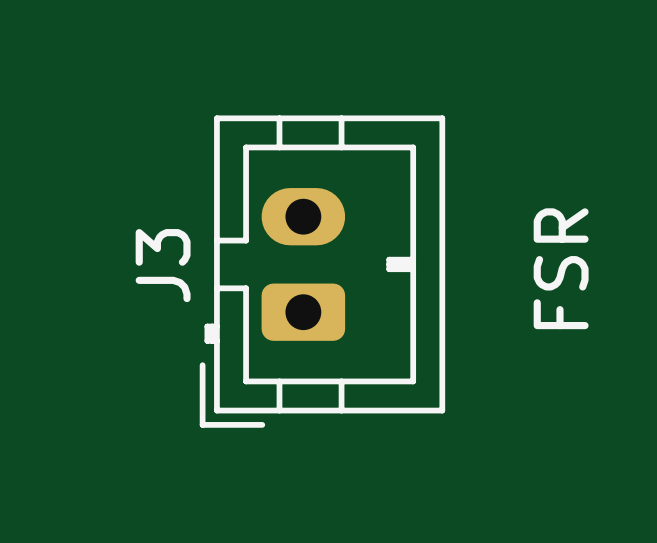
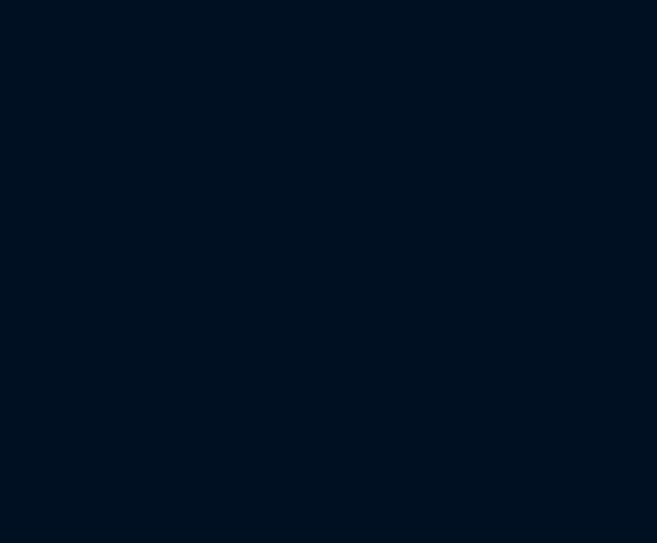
text: FSR (561, 268) -> none
J3: (322, 271) -> none

